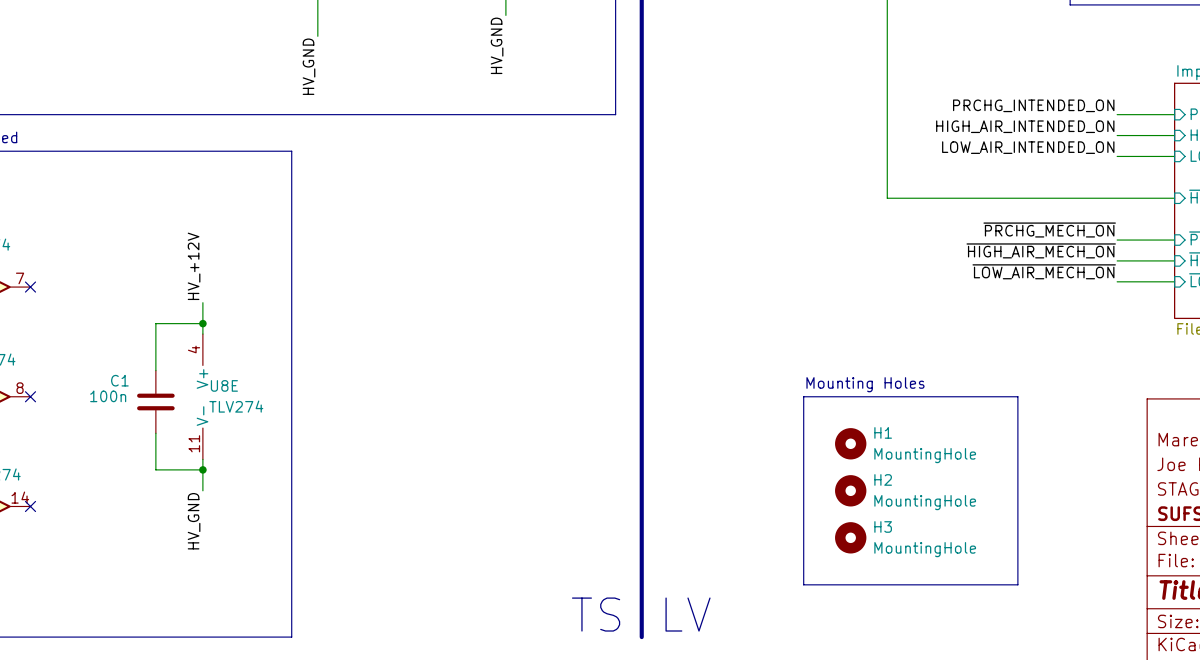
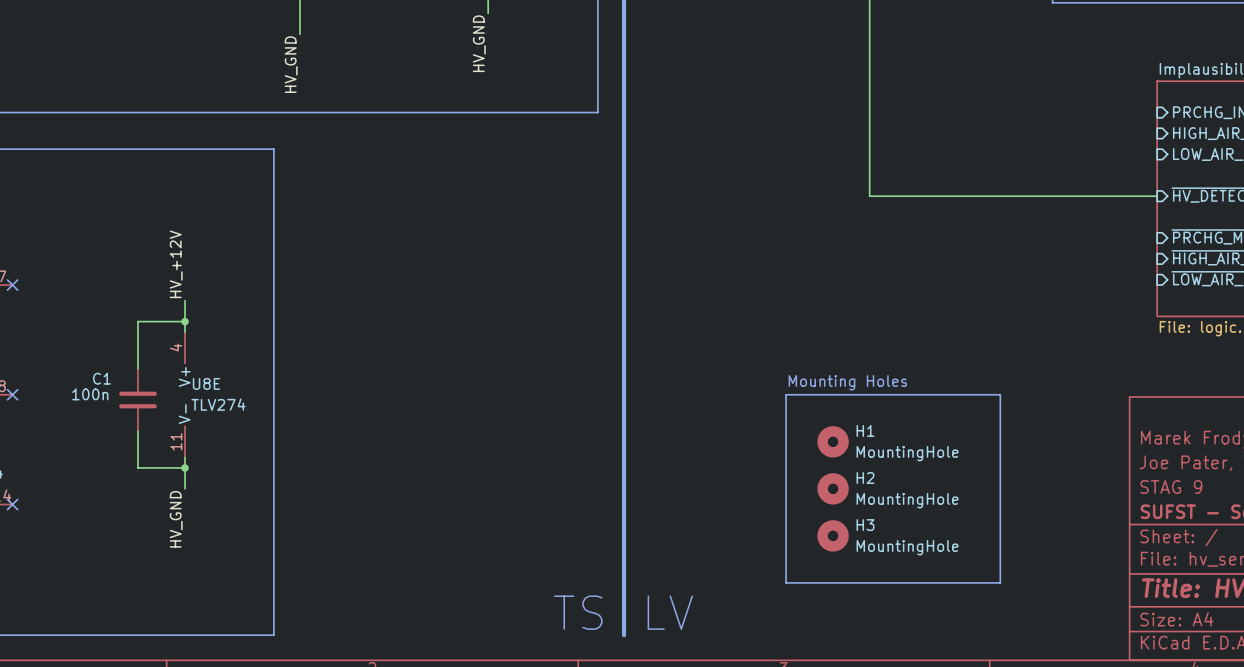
label: PRCHG_INTENDED_ON (1033, 105) -> none
wire: (1117, 114) (1174, 114) -> none
label: HIGH_AIR_INTENDED_ON (1025, 126) -> none
wire: (1117, 135) (1174, 135) -> none
label: LOW_AIR_INTENDED_ON (1028, 147) -> none
wire: (1117, 156) (1174, 156) -> none
label: ~{PRCHG_MECH_ON} (1049, 230) -> none
wire: (1117, 240) (1174, 240) -> none
label: ~{HIGH_AIR_MECH_ON} (1041, 250) -> none
wire: (1117, 260) (1174, 260) -> none
label: ~{LOW_AIR_MECH_ON} (1044, 271) -> none
wire: (1117, 281) (1174, 281) -> none

